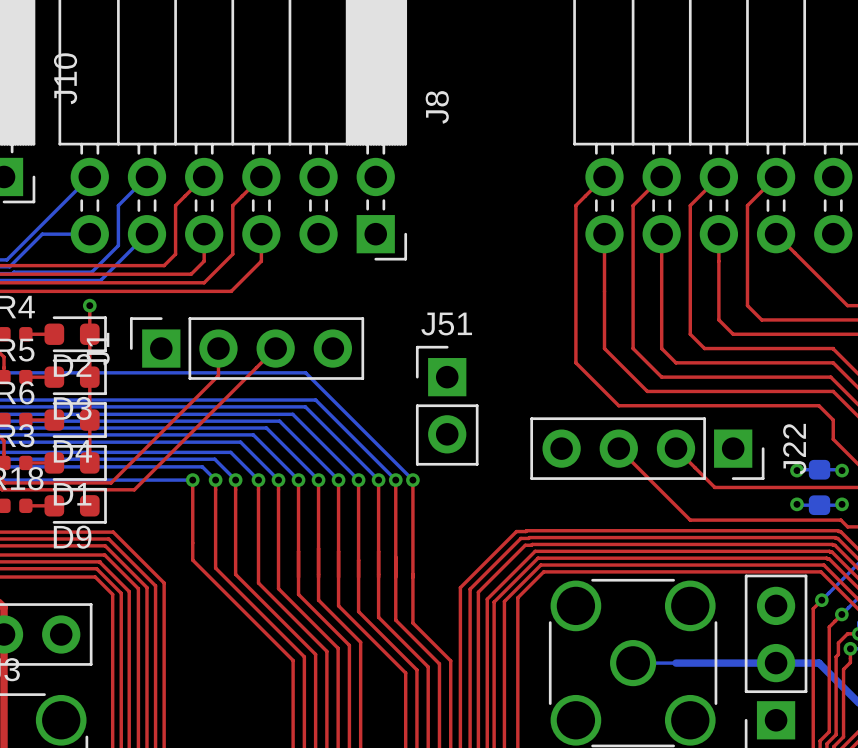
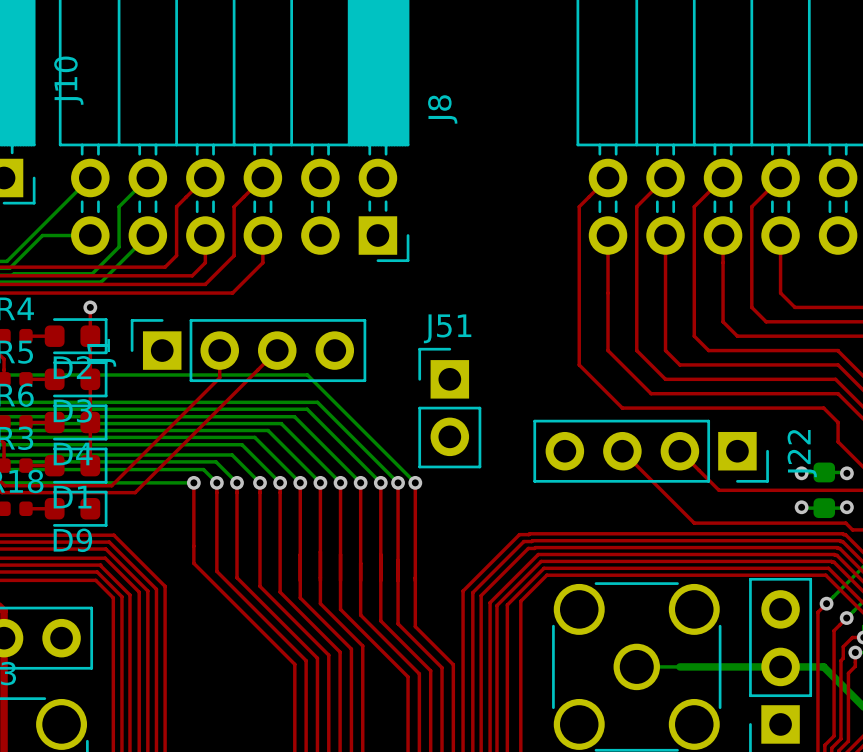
top track: (776, 234) (847, 305) -> (780, 235) (780, 293) (794, 307) (852, 307)

